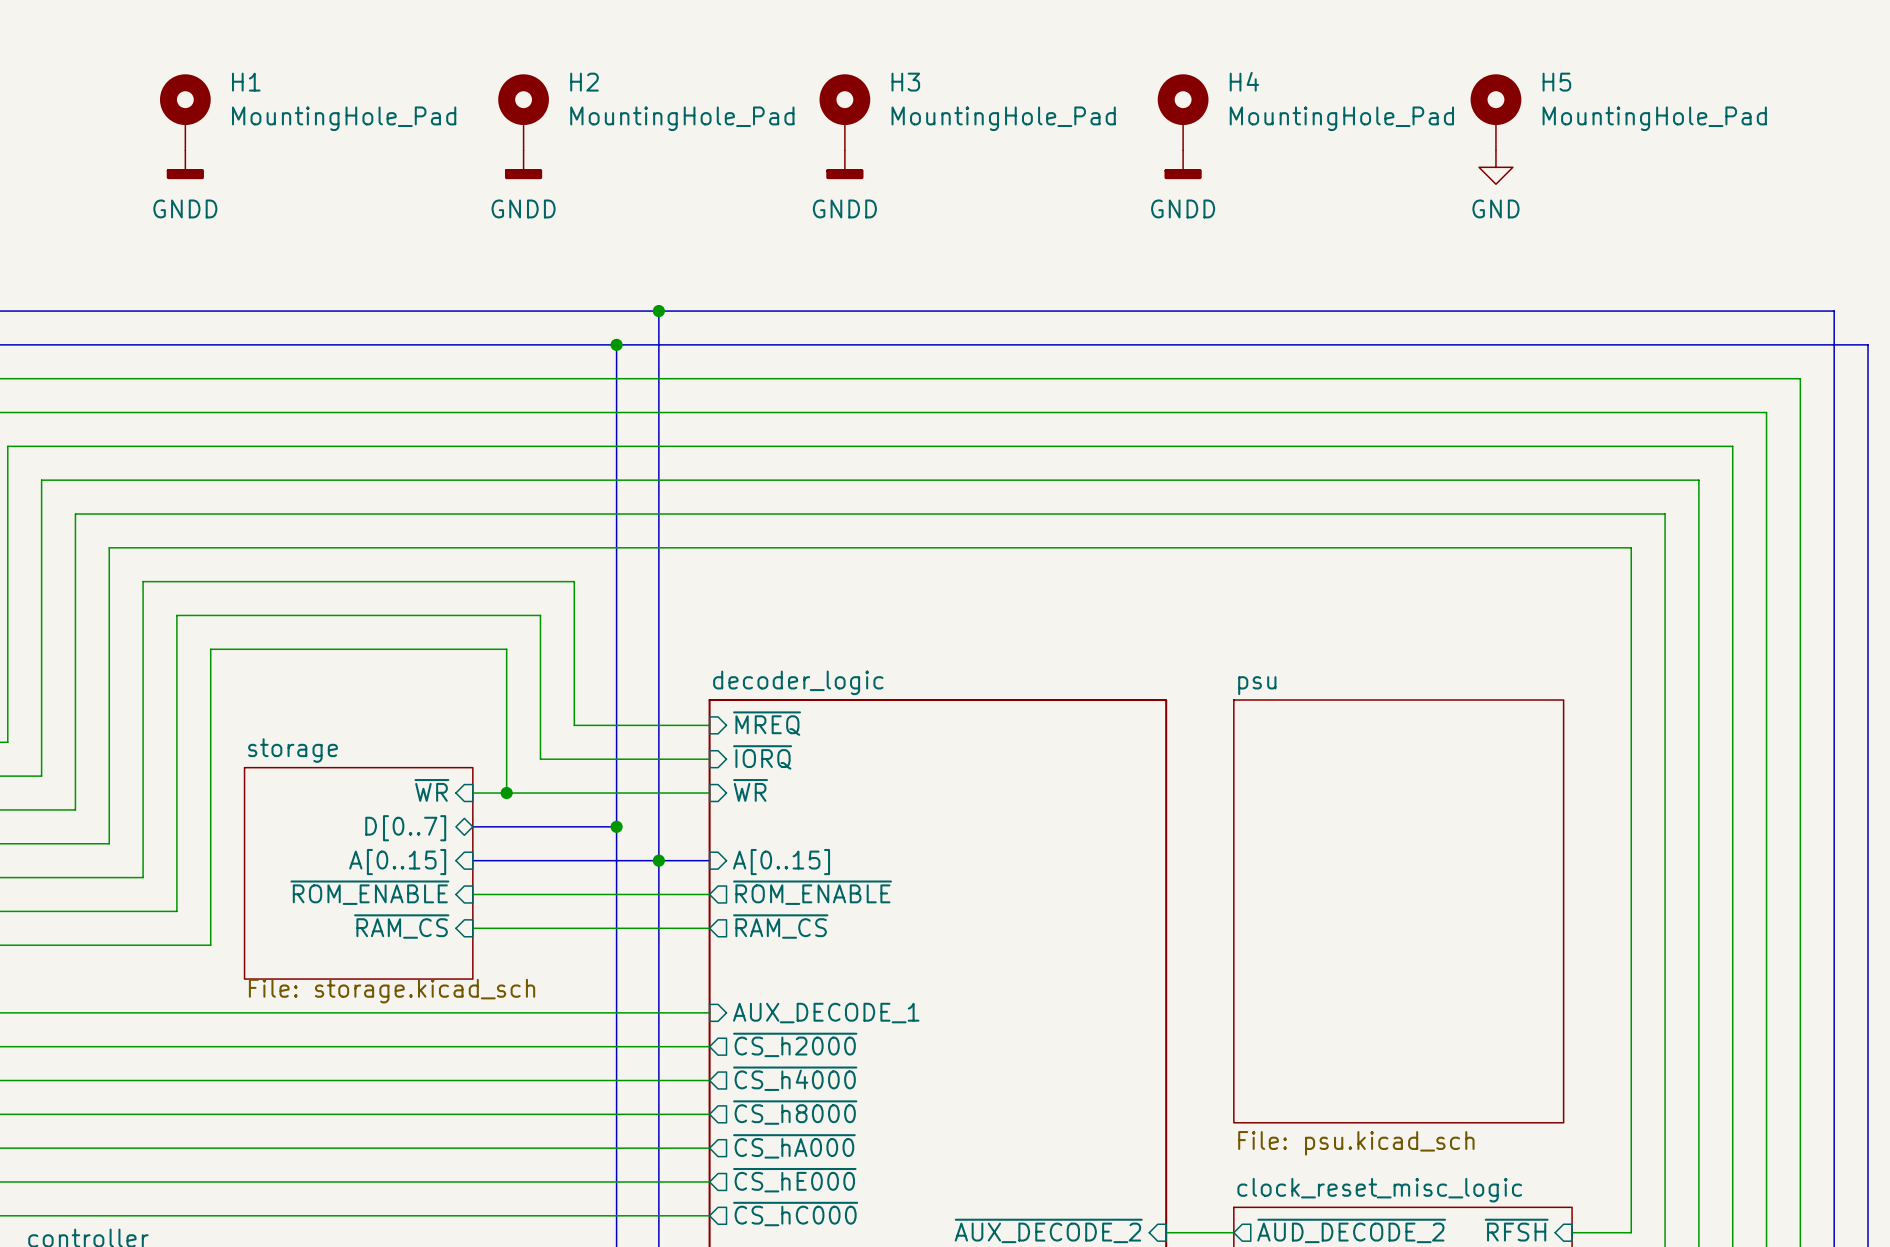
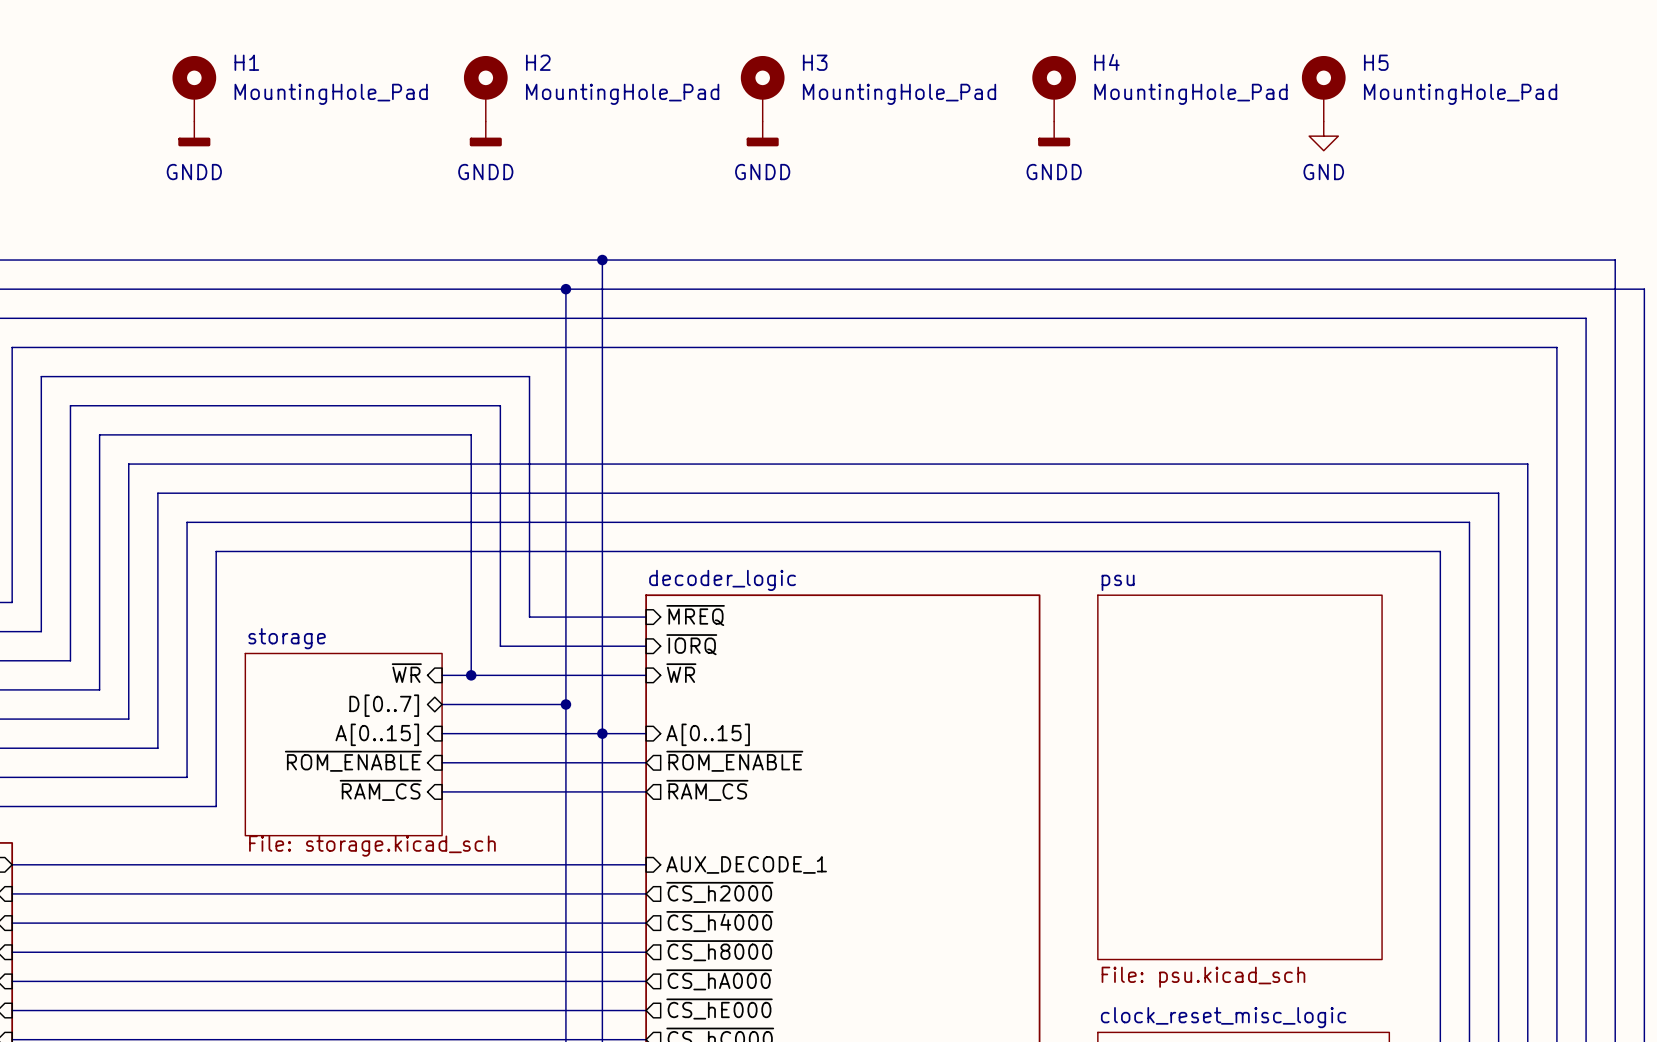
wire: (574, 446) (1732, 446) (1732, 547) -> (529, 376) (529, 493) (1498, 493)
wire: (540, 480) (1698, 480) (1698, 581) -> (500, 405) (500, 522) (1469, 522)
wire: (506, 513) (1665, 513) (1665, 615) -> (471, 434) (471, 551) (1440, 551)
wire: (1631, 547) (1631, 649) -> (1440, 464) (1527, 464)

